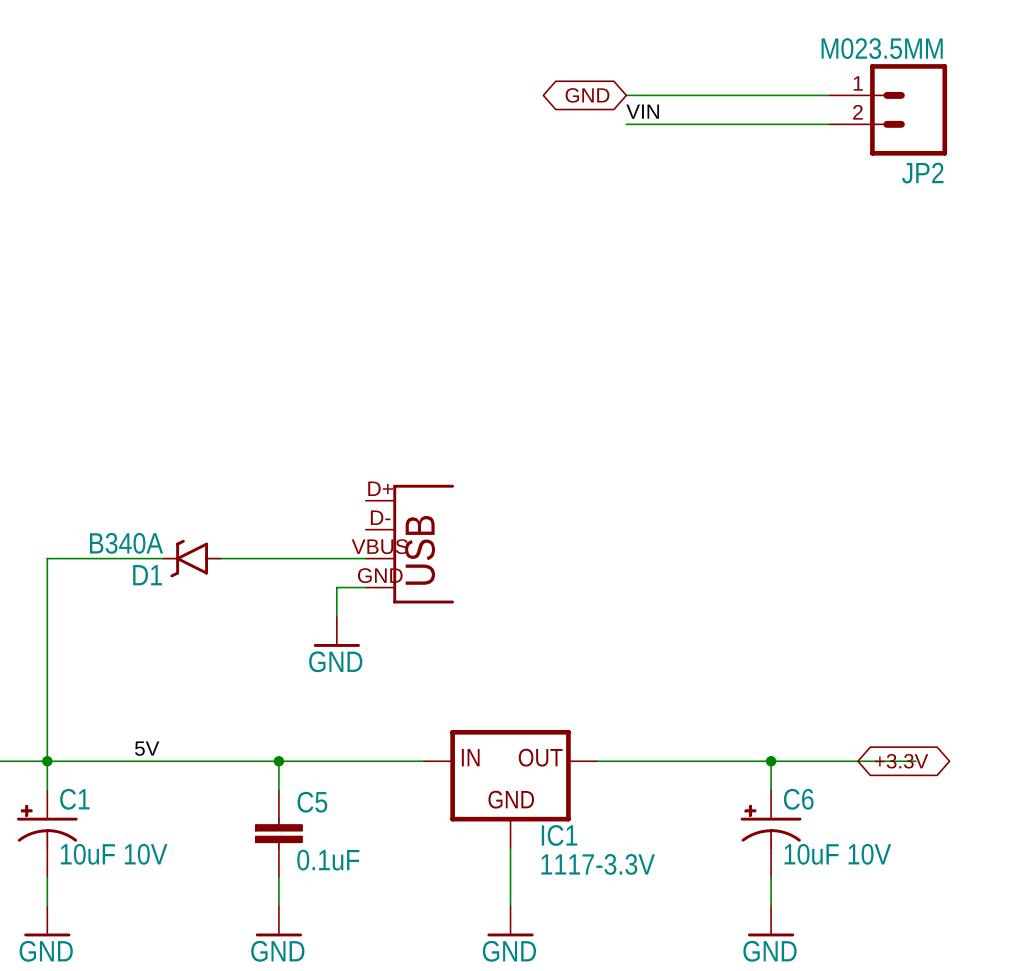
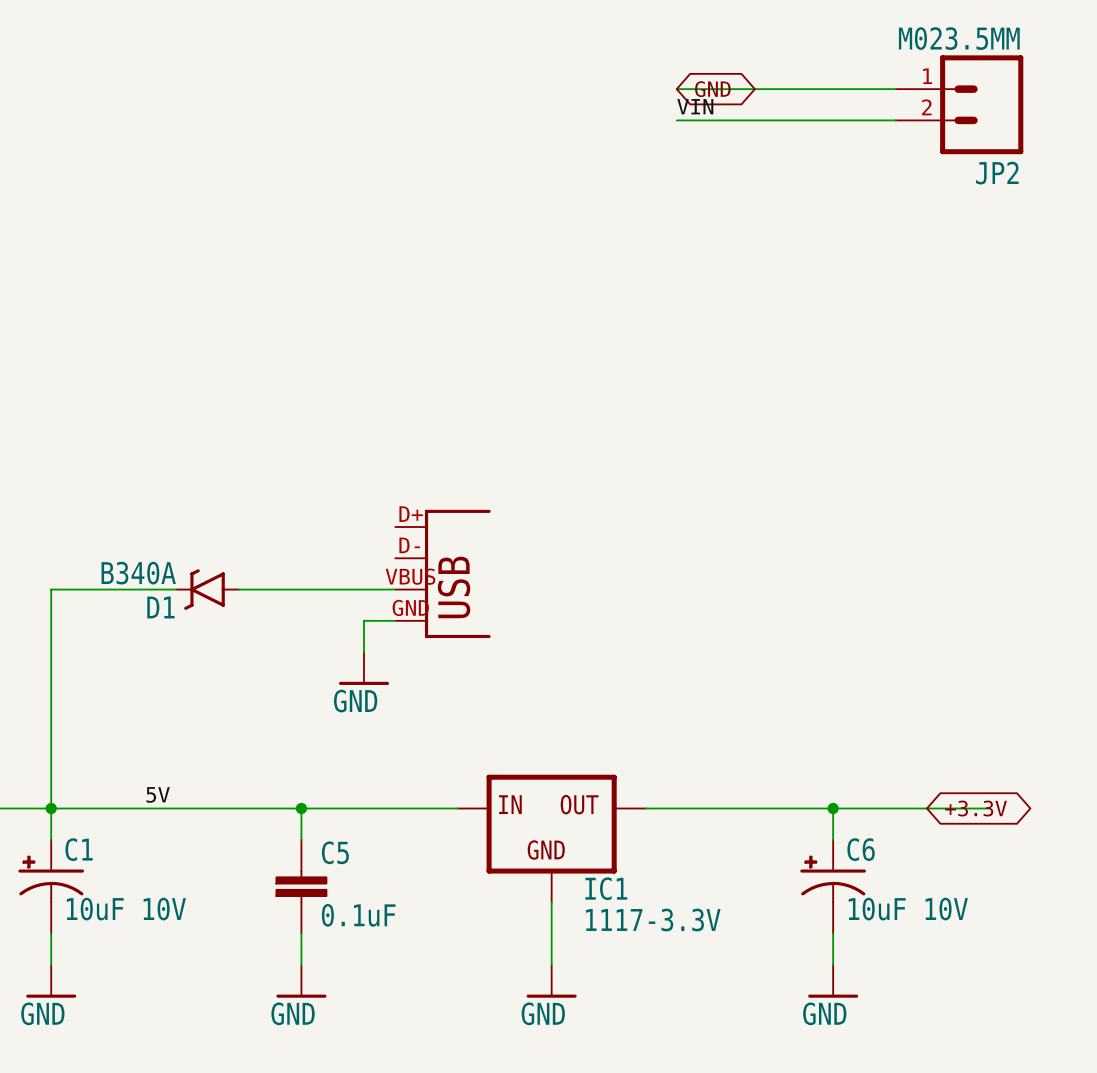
global label rotation: 0° (587, 95) -> 180° (712, 89)

